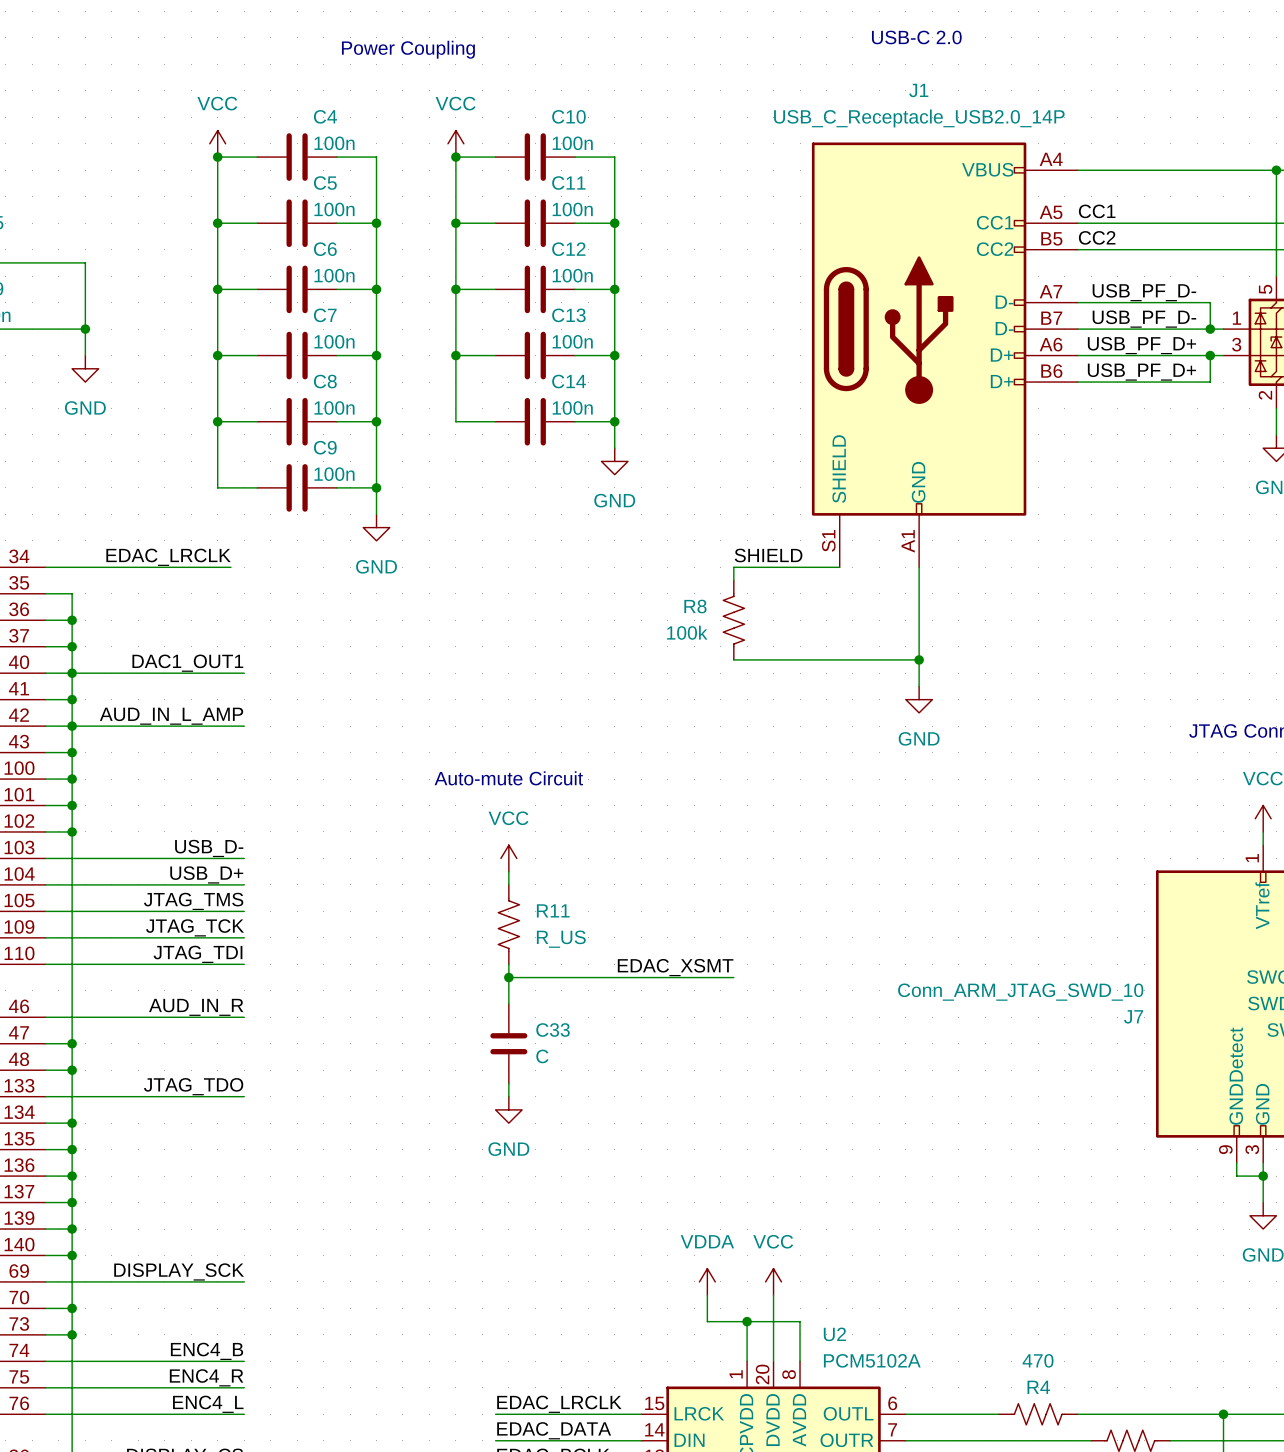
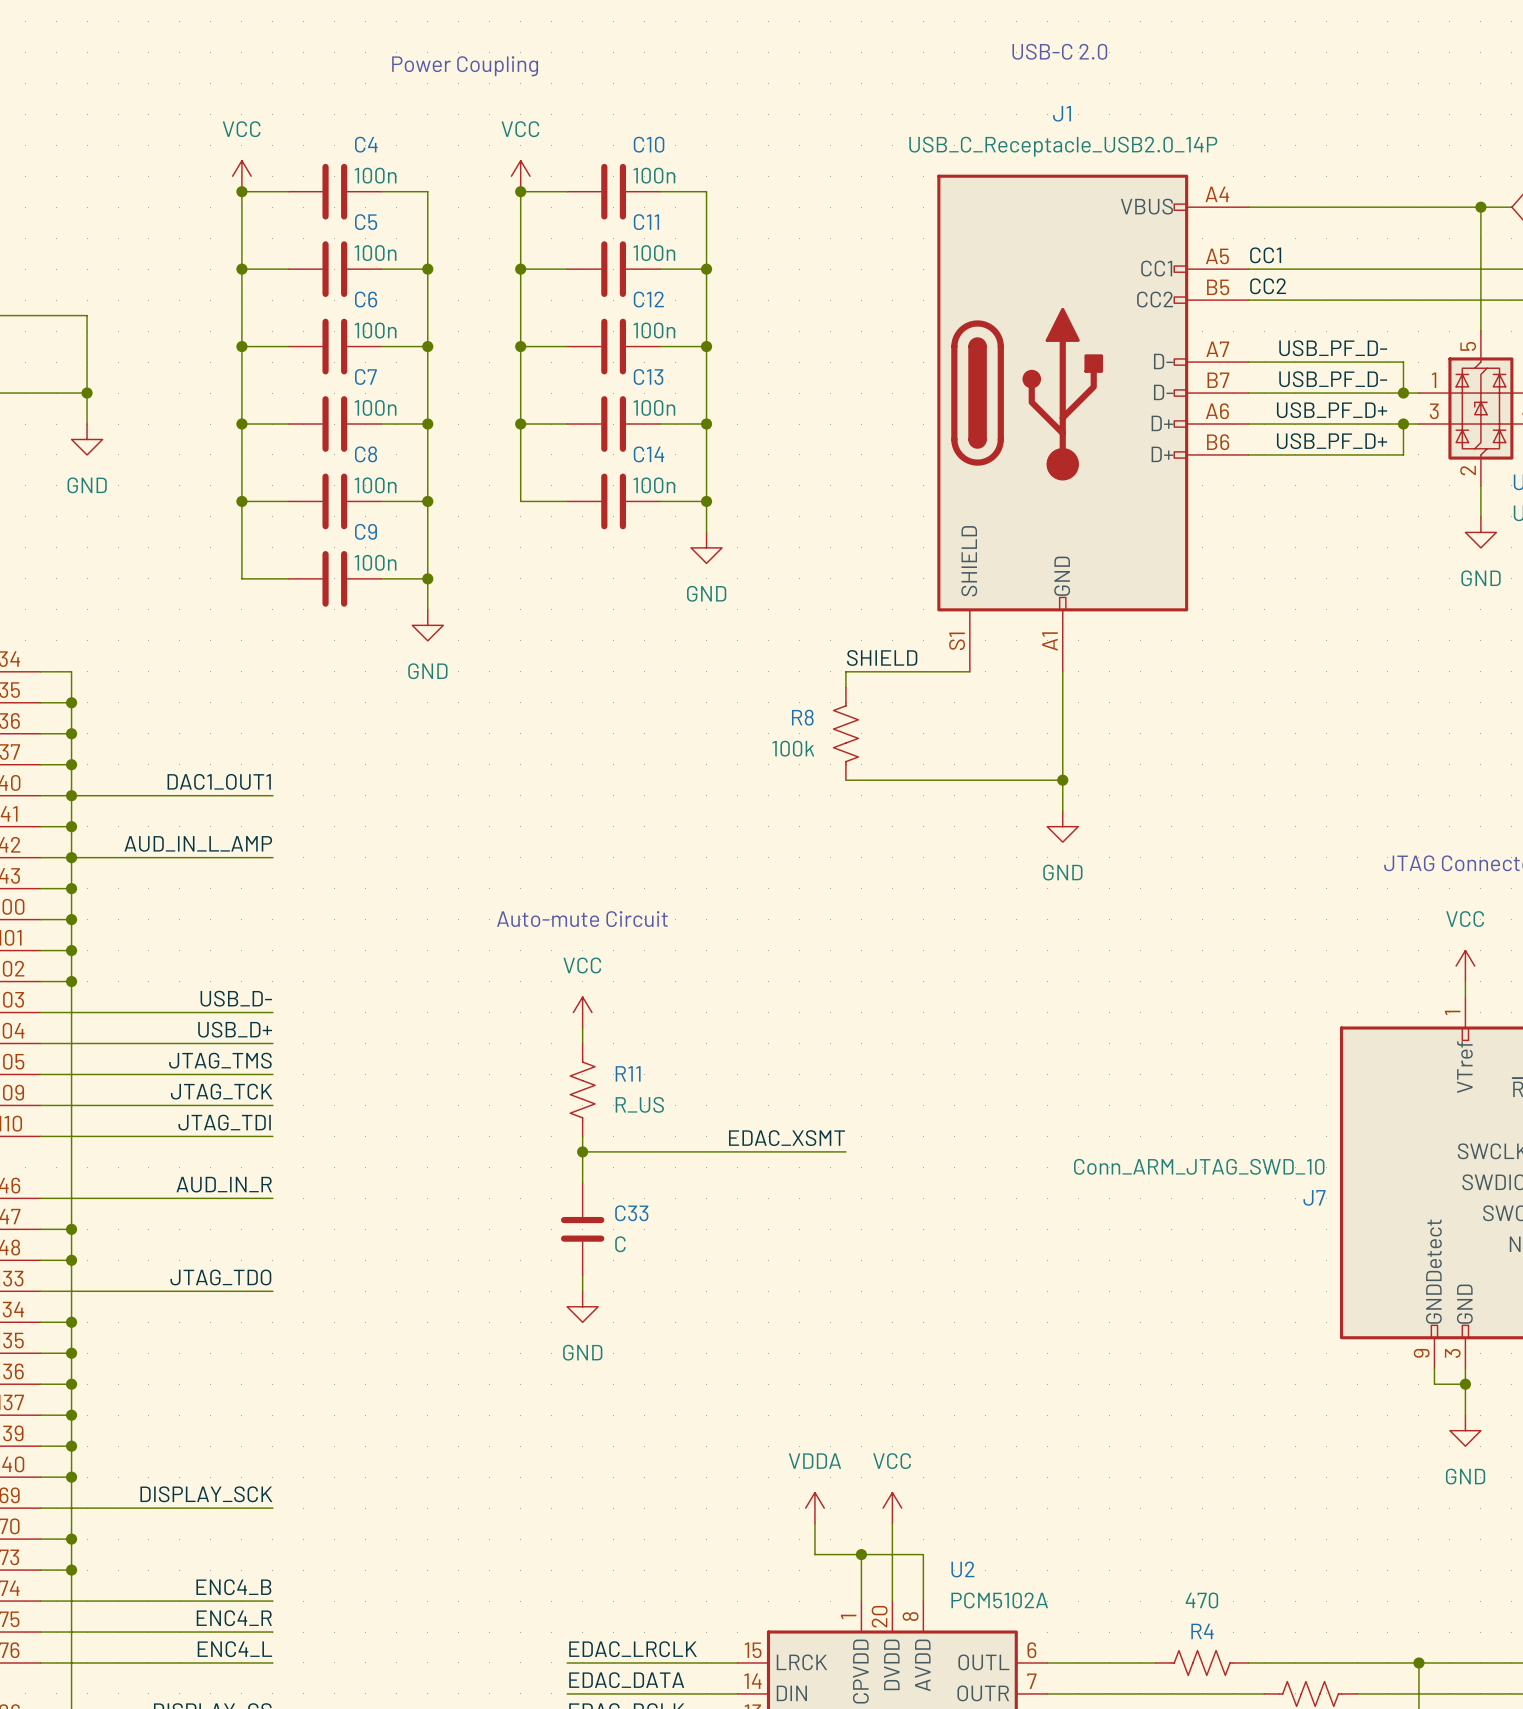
label: EDAC_LRCLK (168, 557) -> none
wire: (72, 567) (230, 567) -> (71, 671) (71, 702)
junction: none -> (71, 702)

